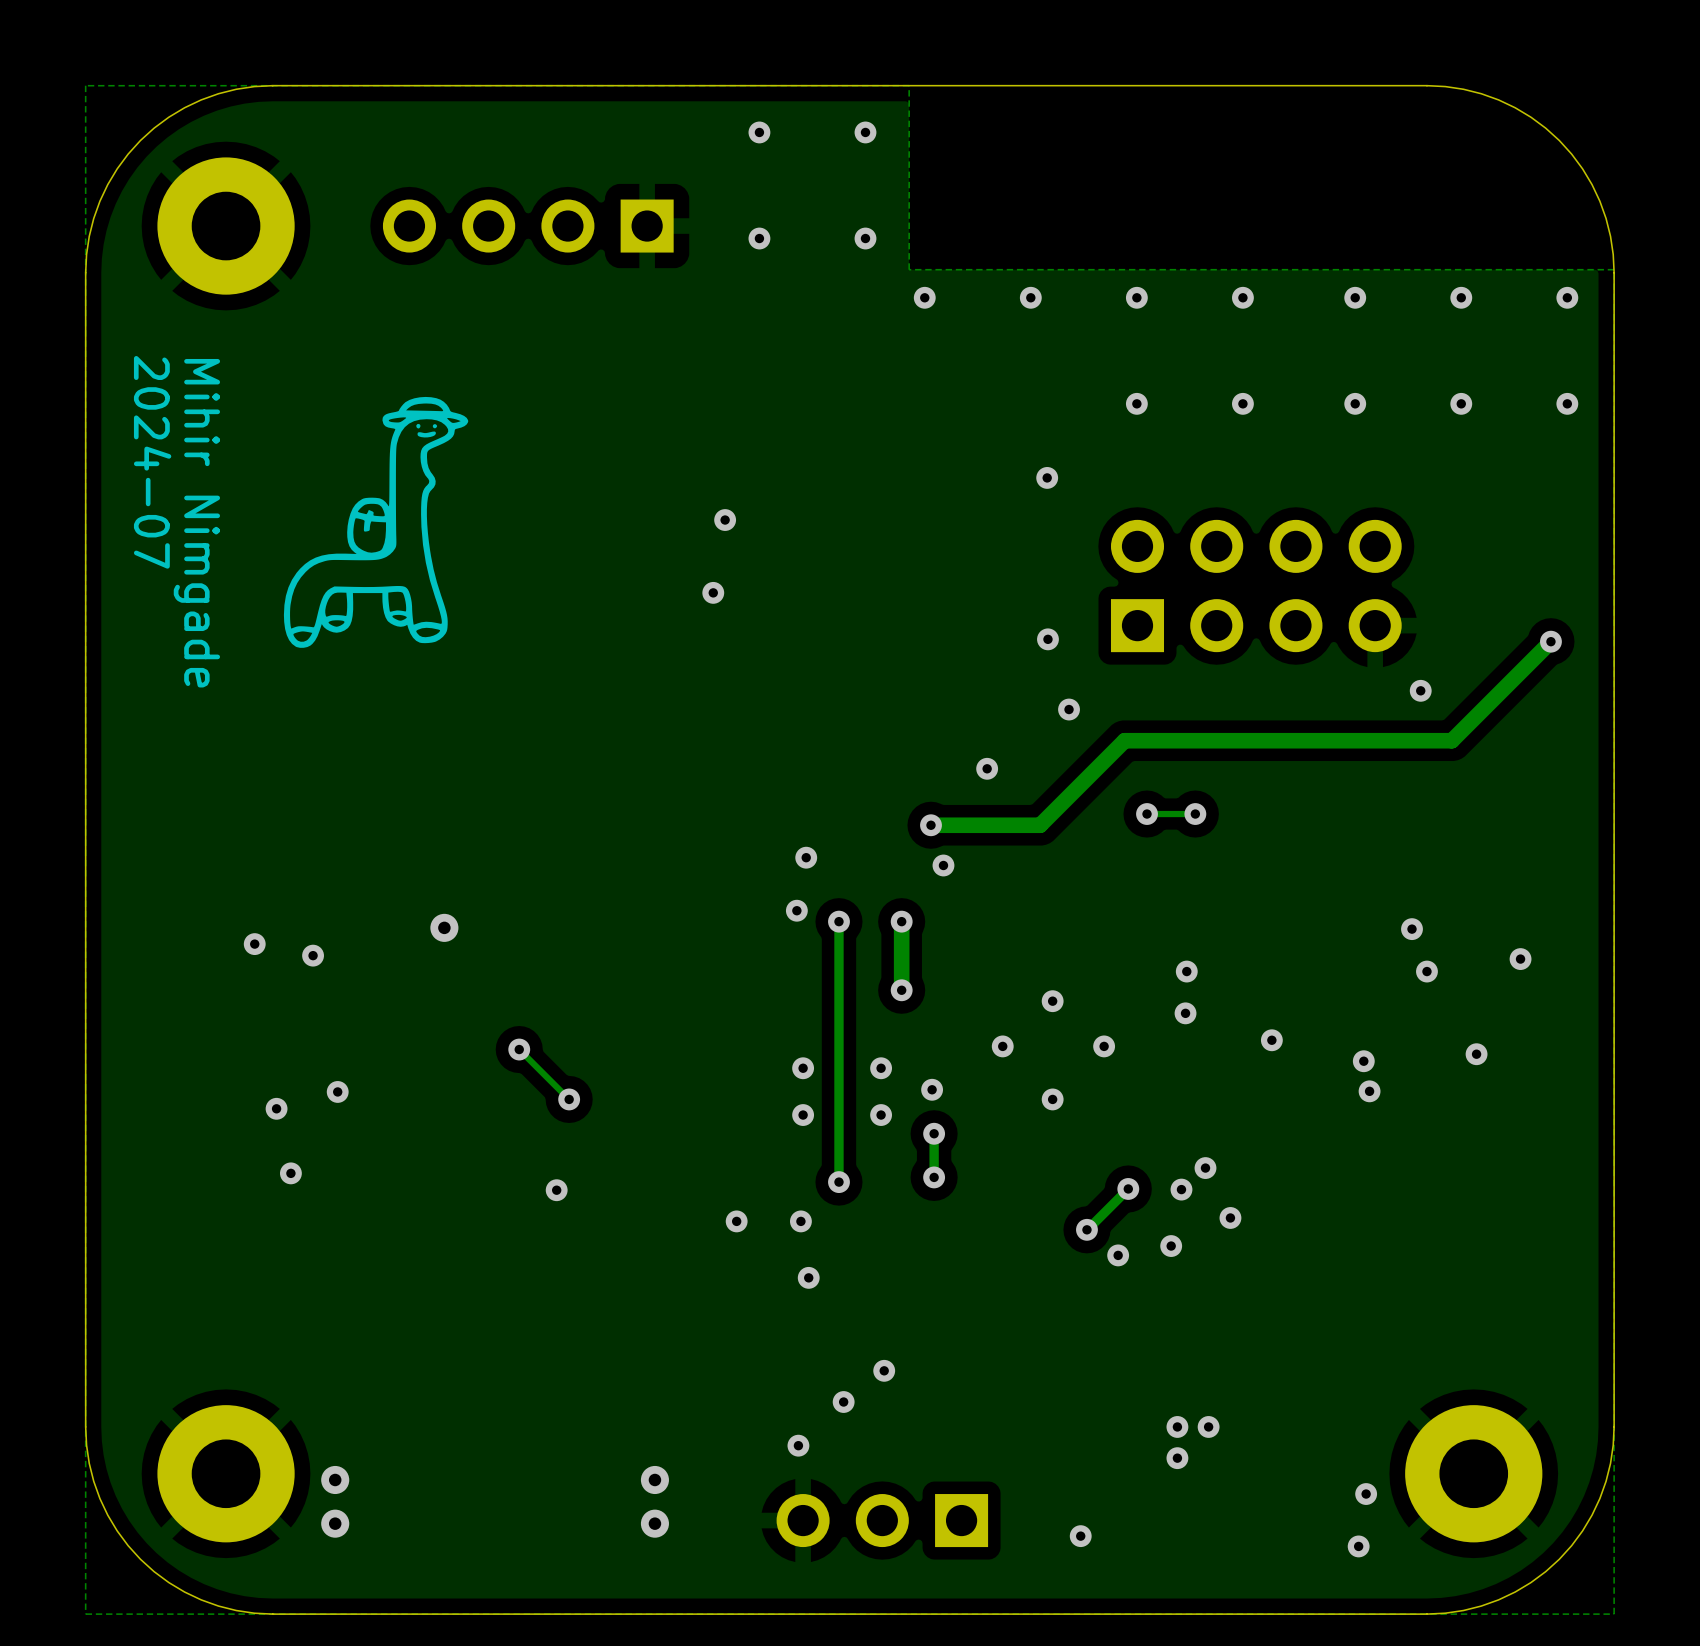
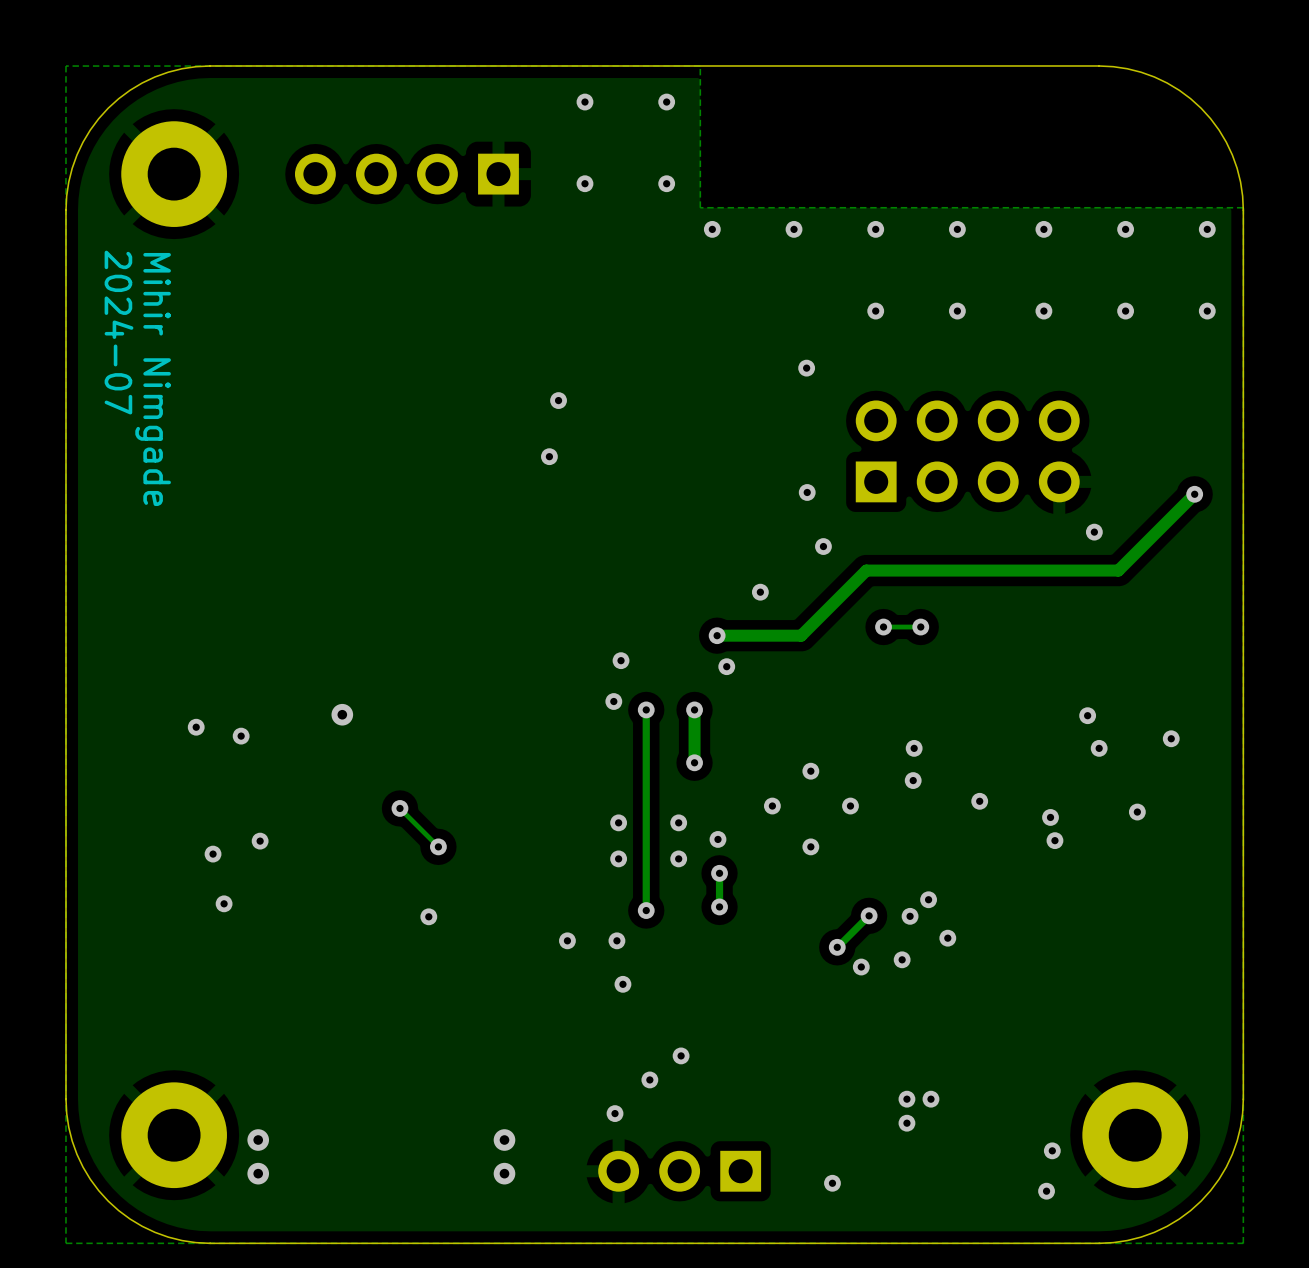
drawing: [283, 396, 469, 648] -> none
text position: 2024-07 (152, 462) -> 2024-07 (119, 332)
text position: Mihir Nimgade (196, 523) -> Mihir Nimgade (153, 379)

